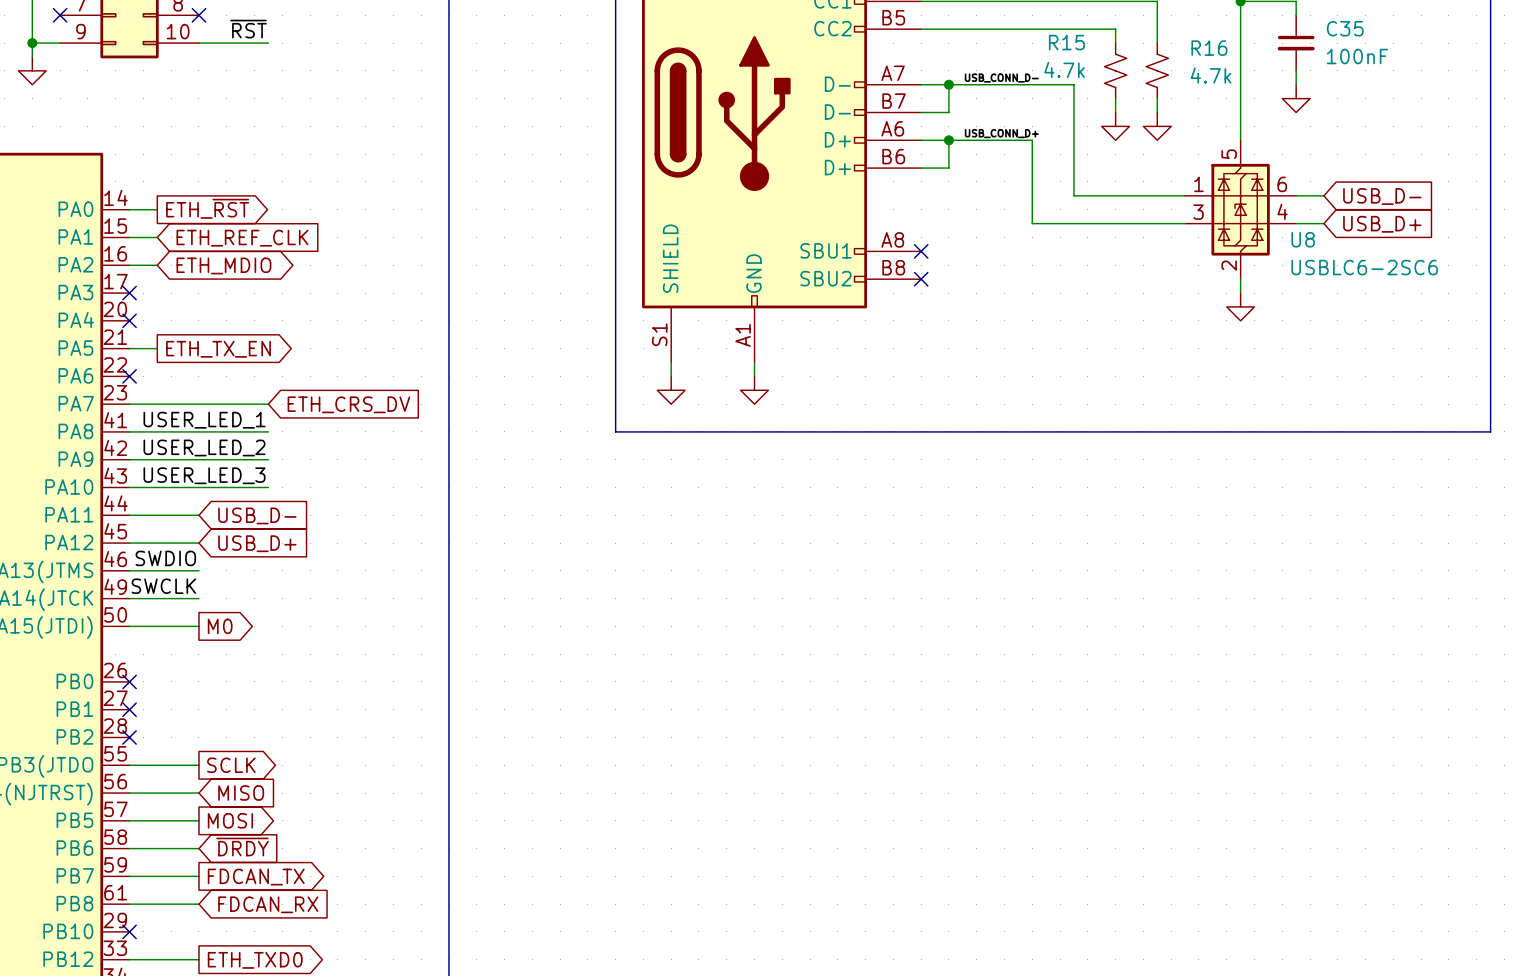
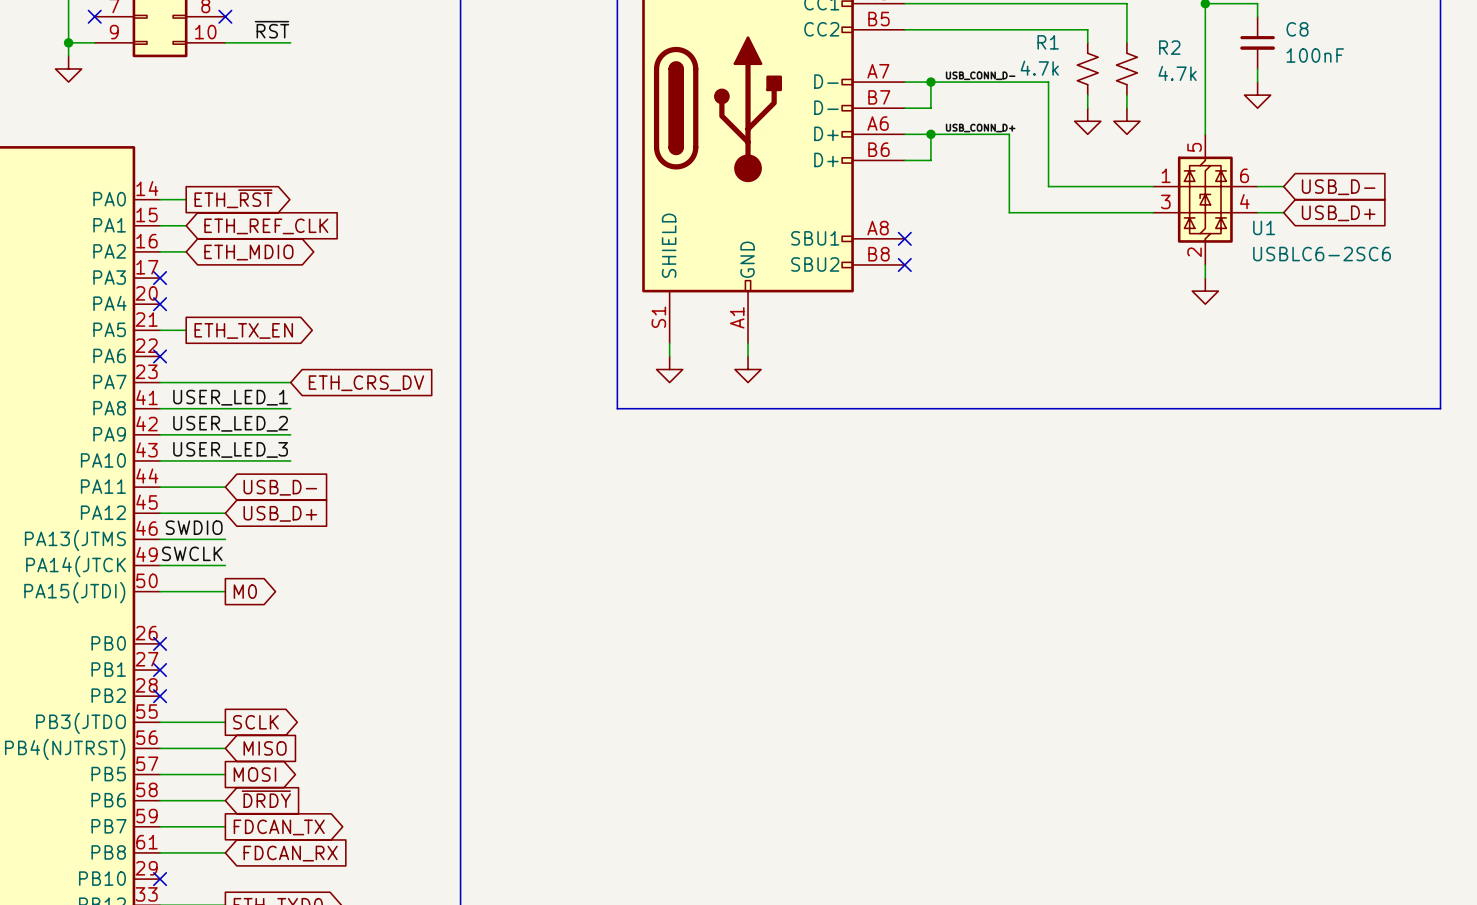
C35 name: C35 (1345, 28) -> C8 (1297, 29)
R15 name: R15 (1066, 42) -> R1 (1048, 42)
R16 name: R16 (1209, 48) -> R2 (1169, 47)
U8 name: U8 (1303, 239) -> U1 (1264, 227)

